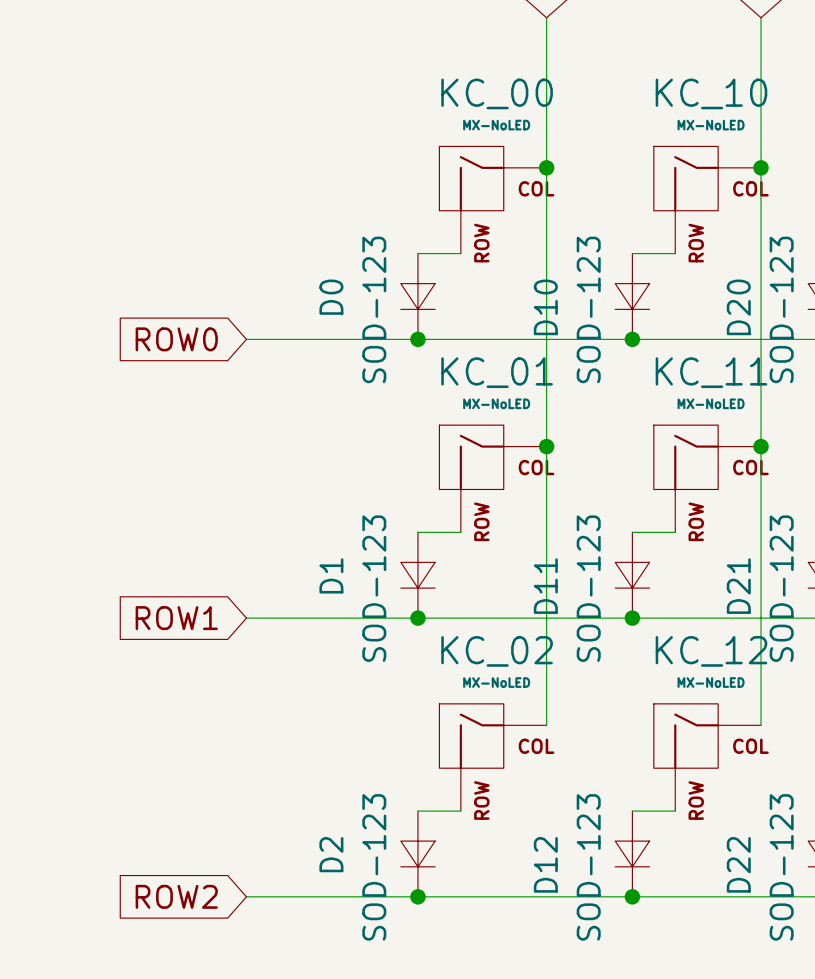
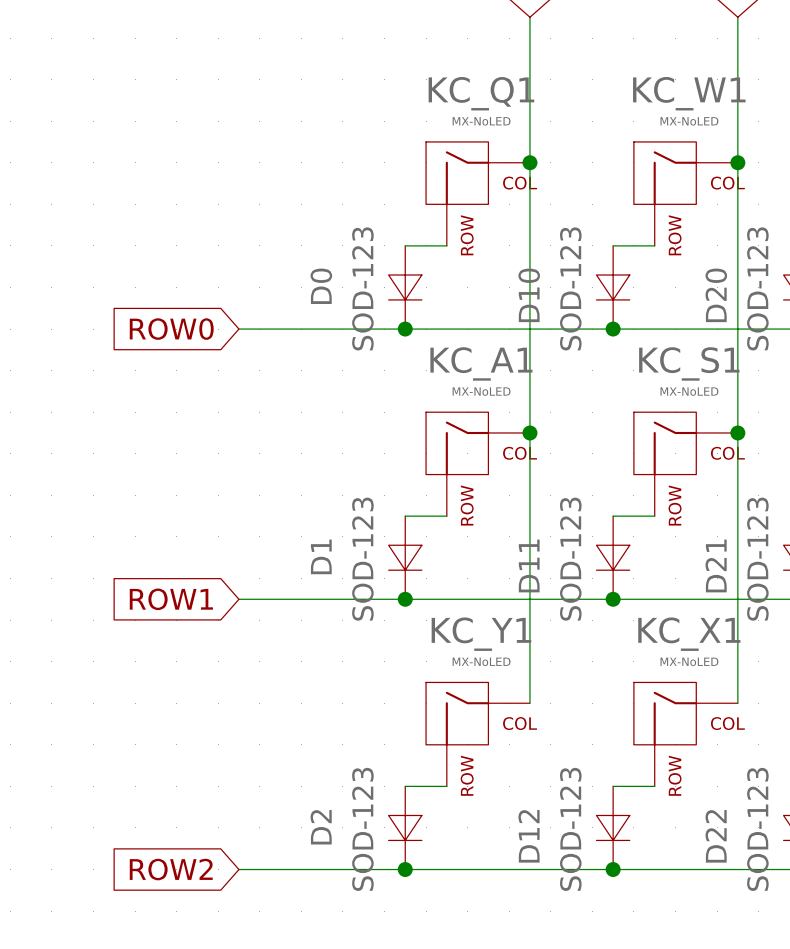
KC_00 name: KC_00 (497, 93) -> KC_Q1 (481, 93)
KC_10 name: KC_10 (711, 93) -> KC_W1 (689, 93)
KC_01 name: KC_01 (497, 372) -> KC_A1 (481, 363)
KC_11 name: KC_11 (711, 372) -> KC_S1 (689, 363)
KC_02 name: KC_02 (497, 651) -> KC_Y1 (481, 634)
KC_12 name: KC_12 (711, 651) -> KC_X1 (689, 634)

